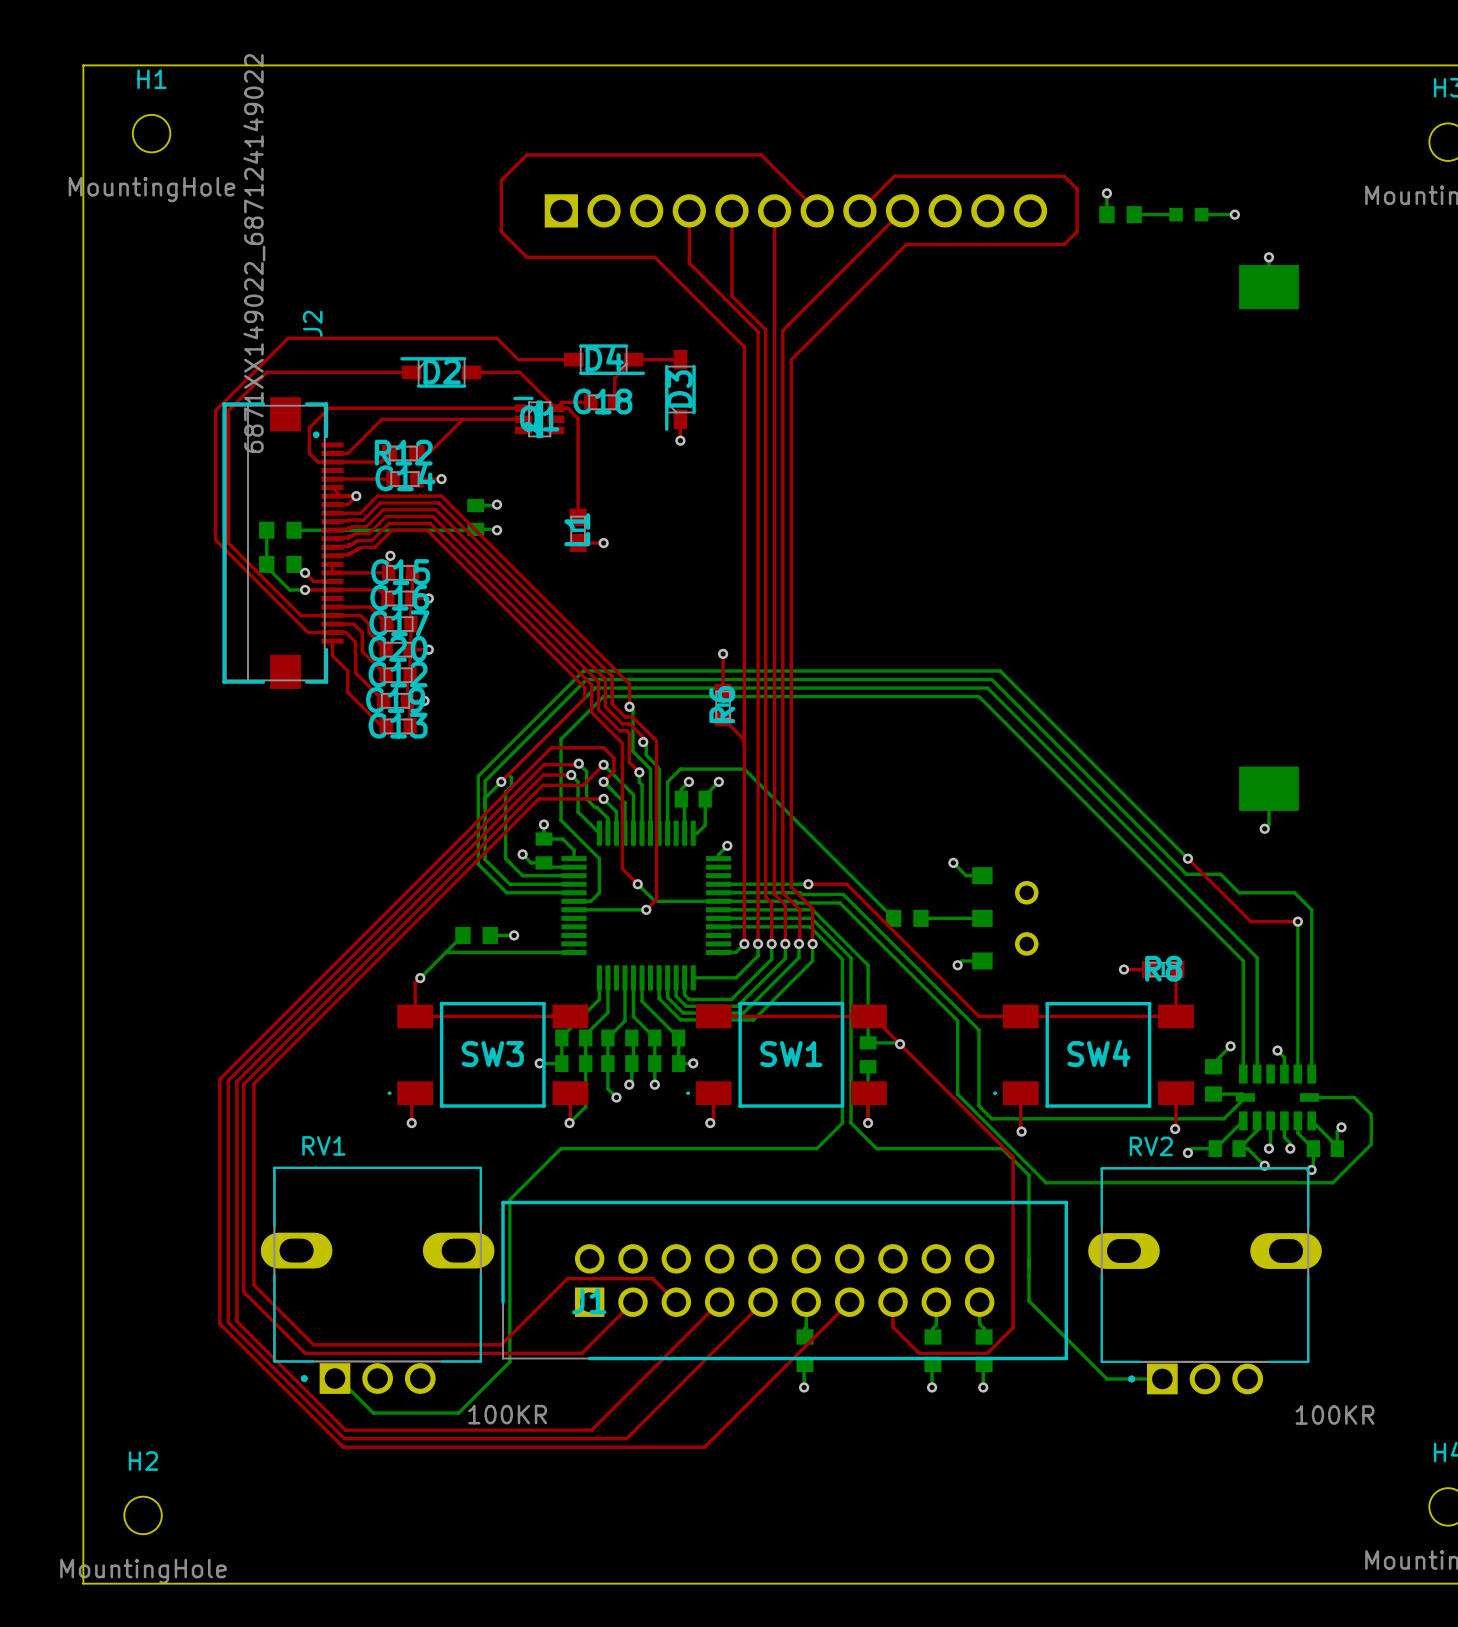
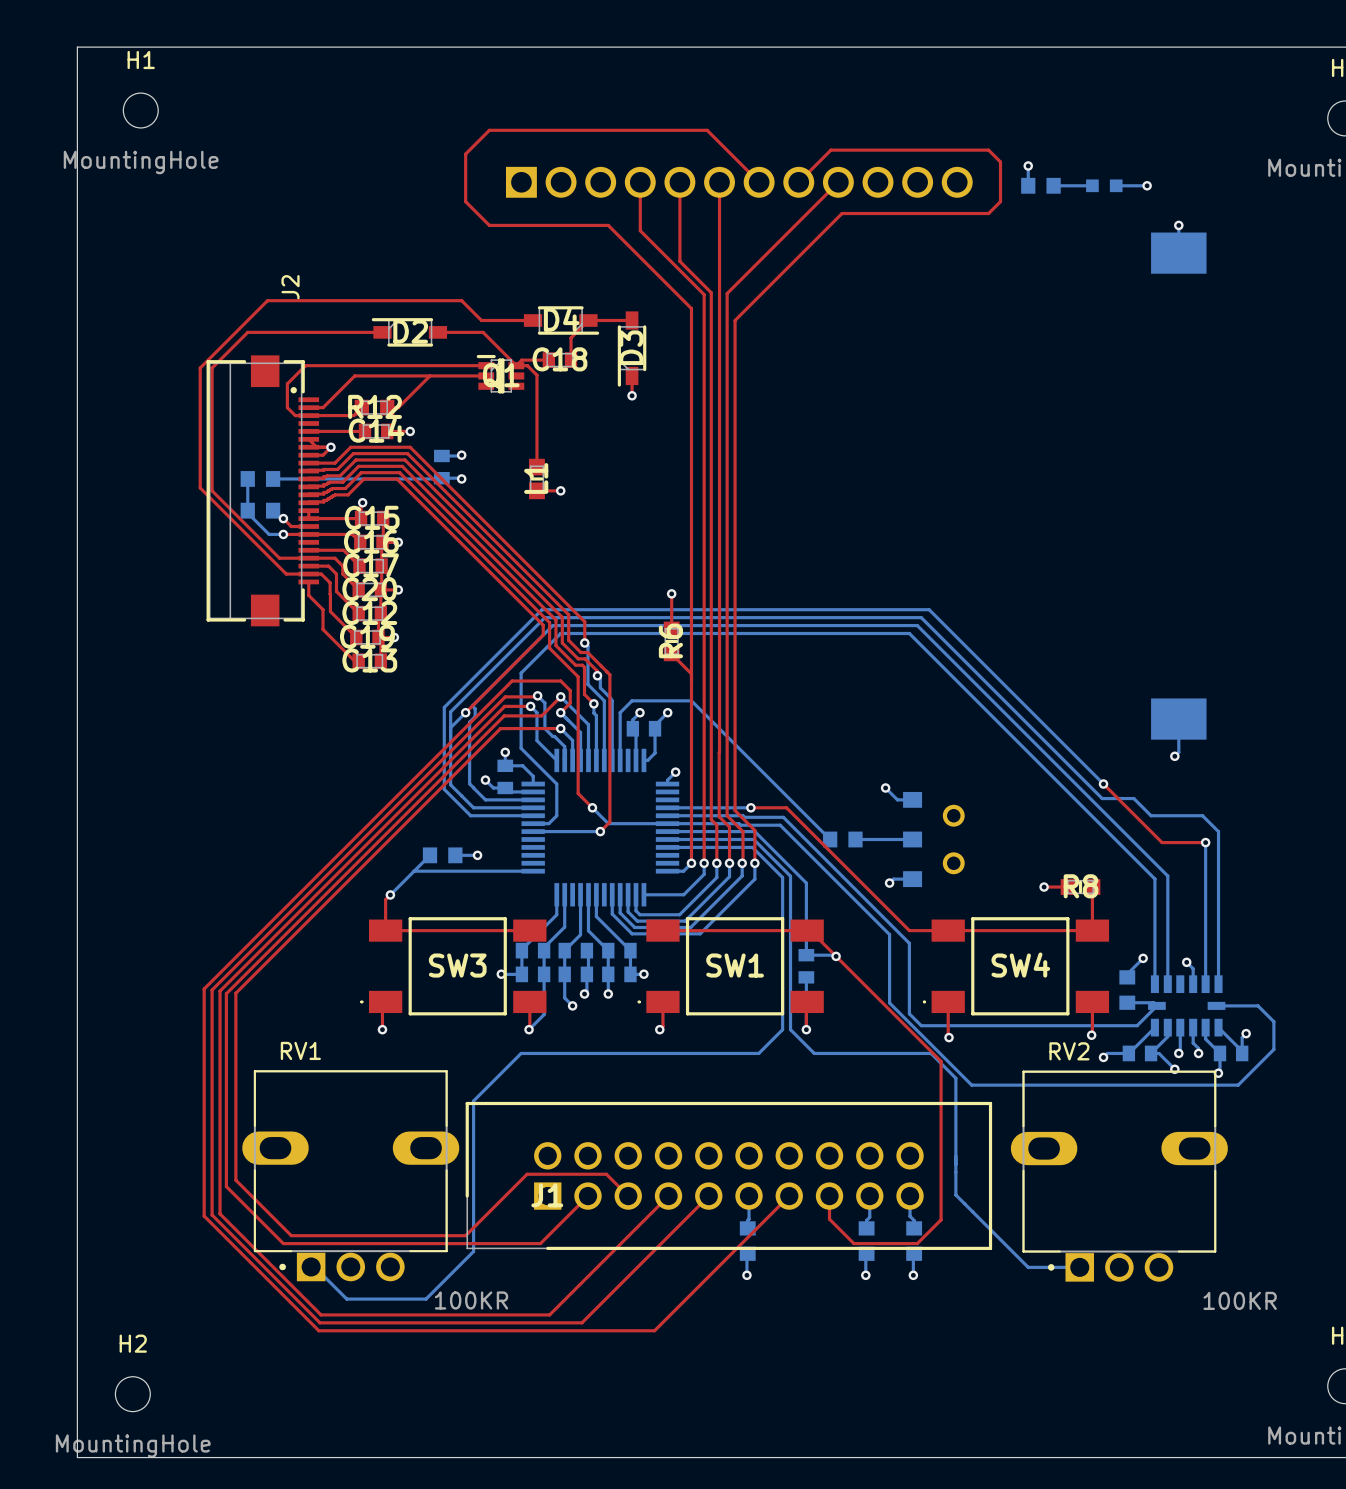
J2 value: 6871XX149022_687124149022 (254, 253) -> none

